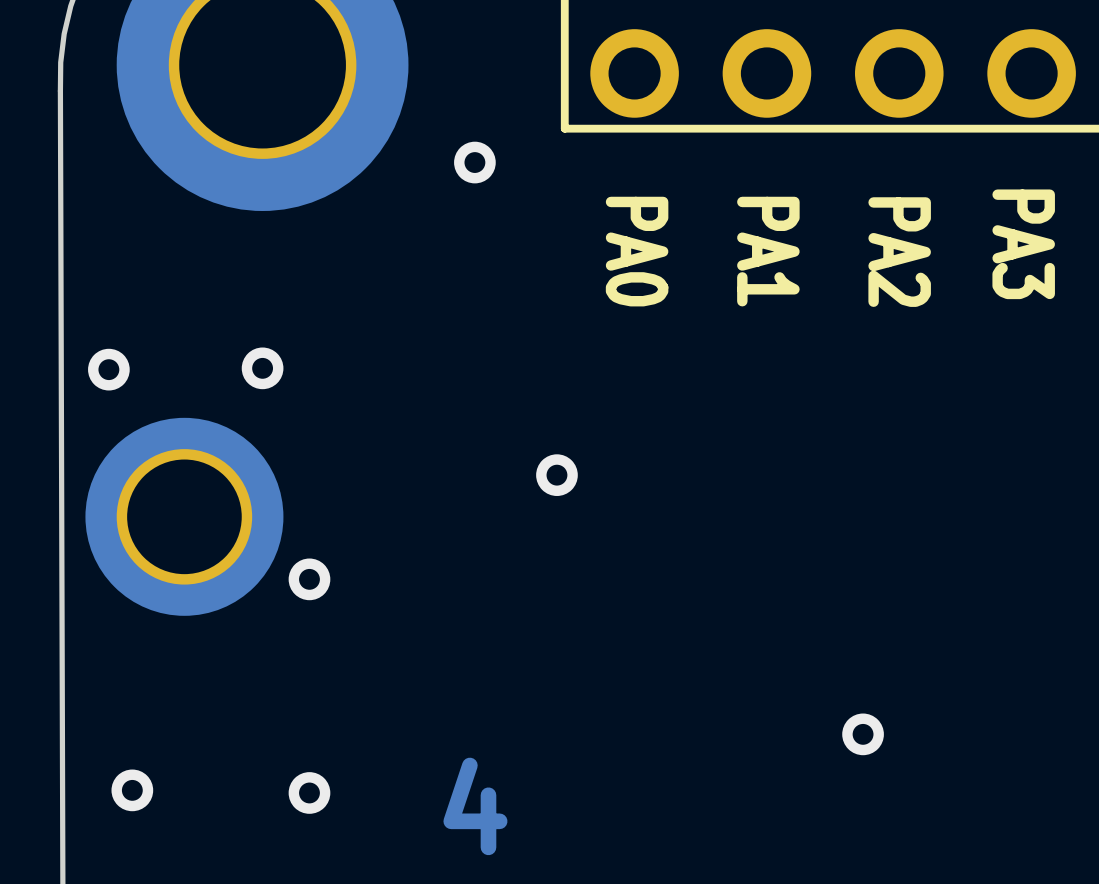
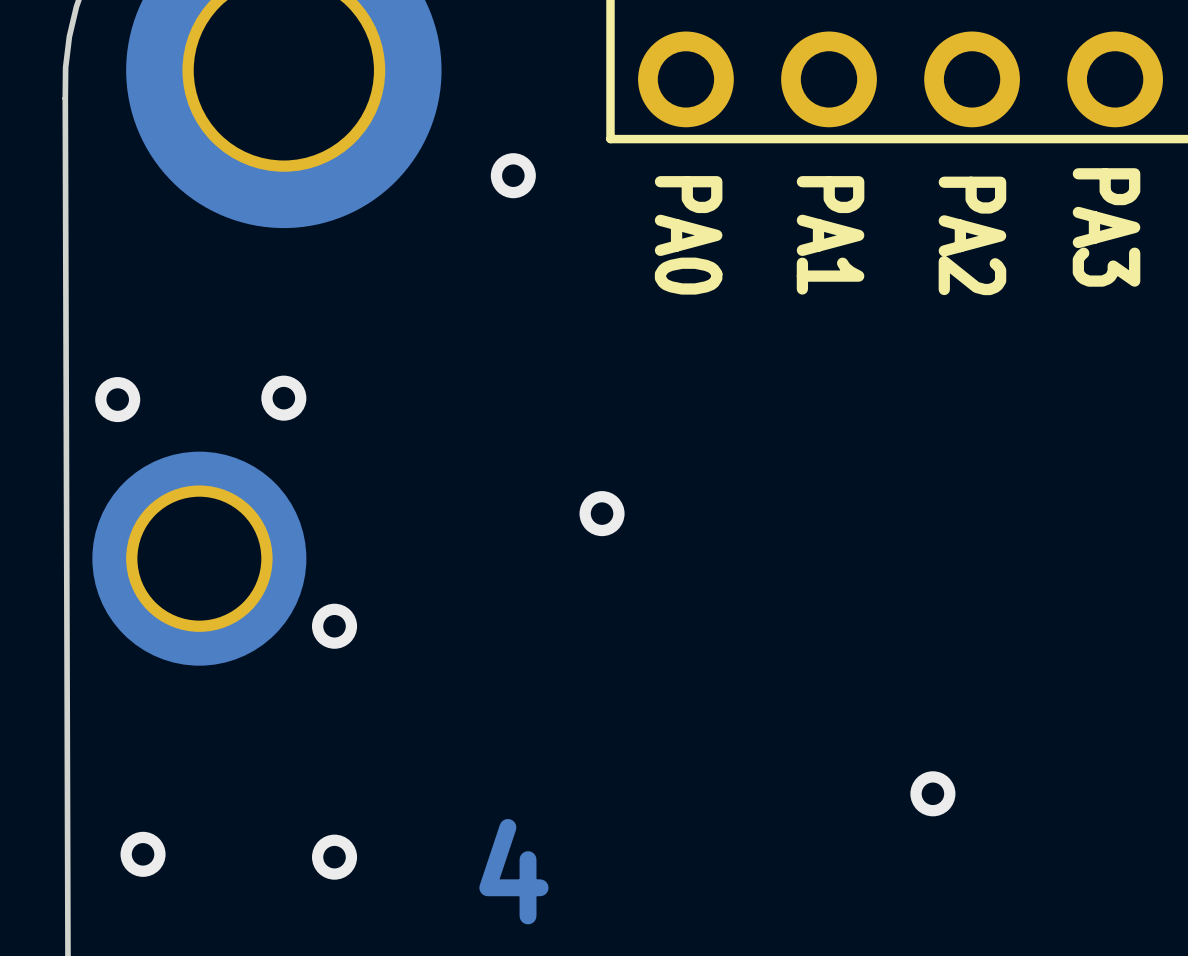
text position: PA3 (1023, 244) -> PA3 (1106, 227)
text position: PA0 (637, 251) -> PA0 (688, 235)
text position: PA1 (768, 251) -> PA1 (830, 235)
text position: PA2 (899, 252) -> PA2 (972, 235)

